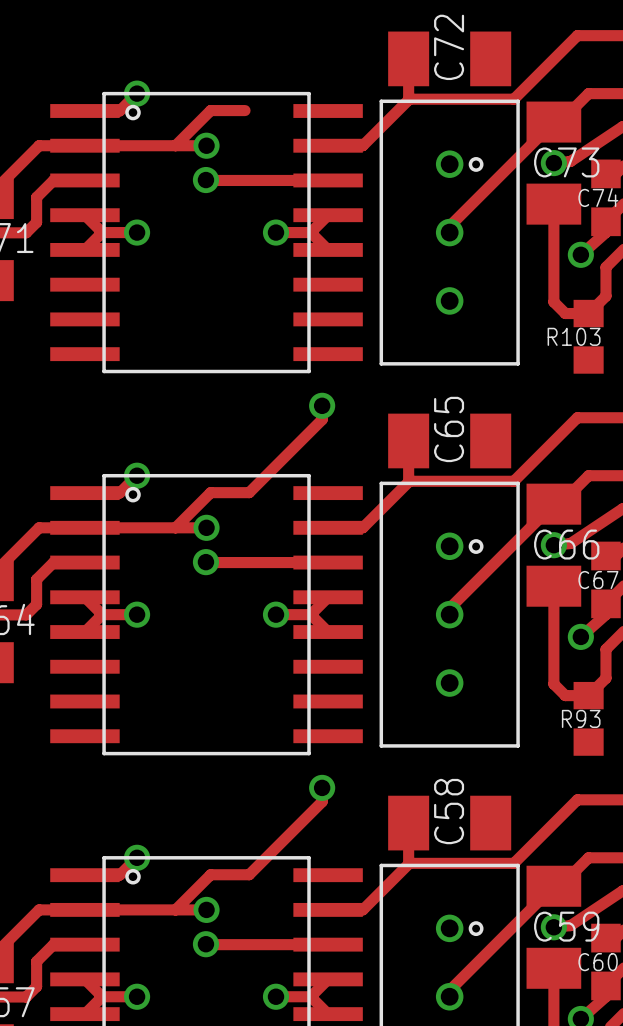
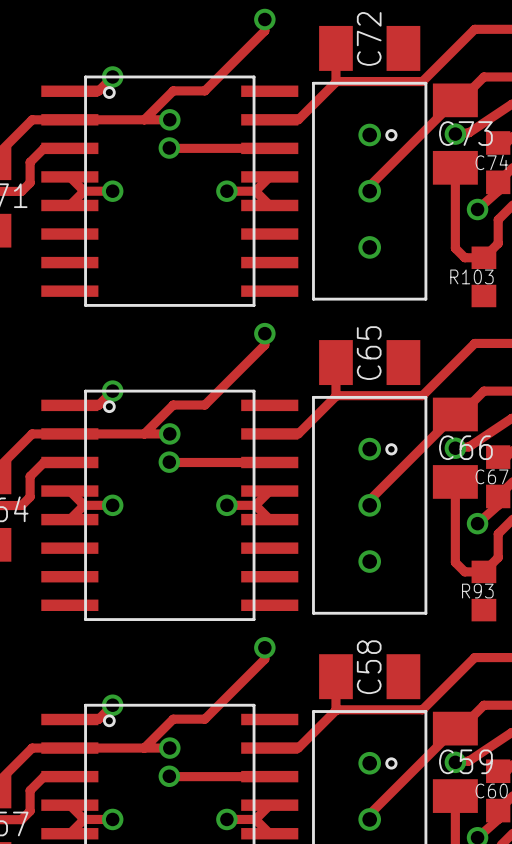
track: none -> (264, 19) (264, 30) (204, 90) (201, 90)
via: none -> (264, 19)

